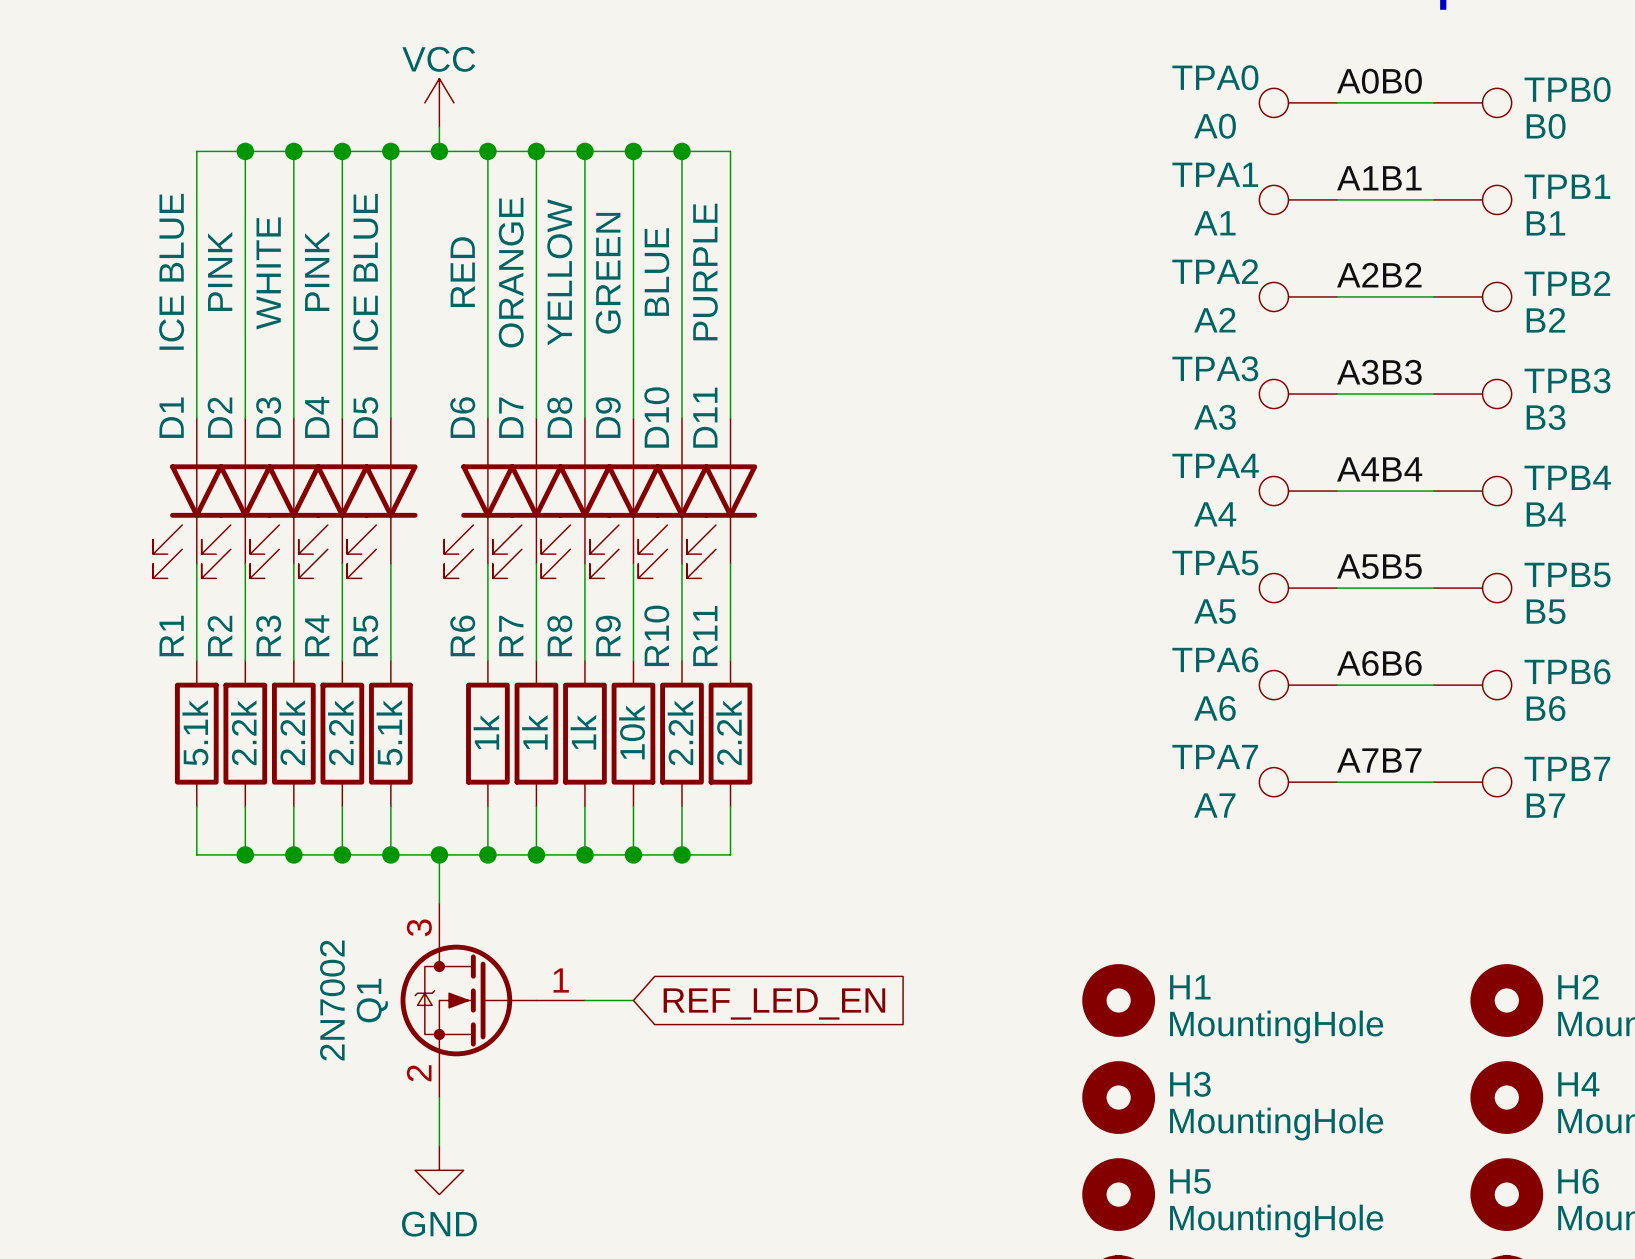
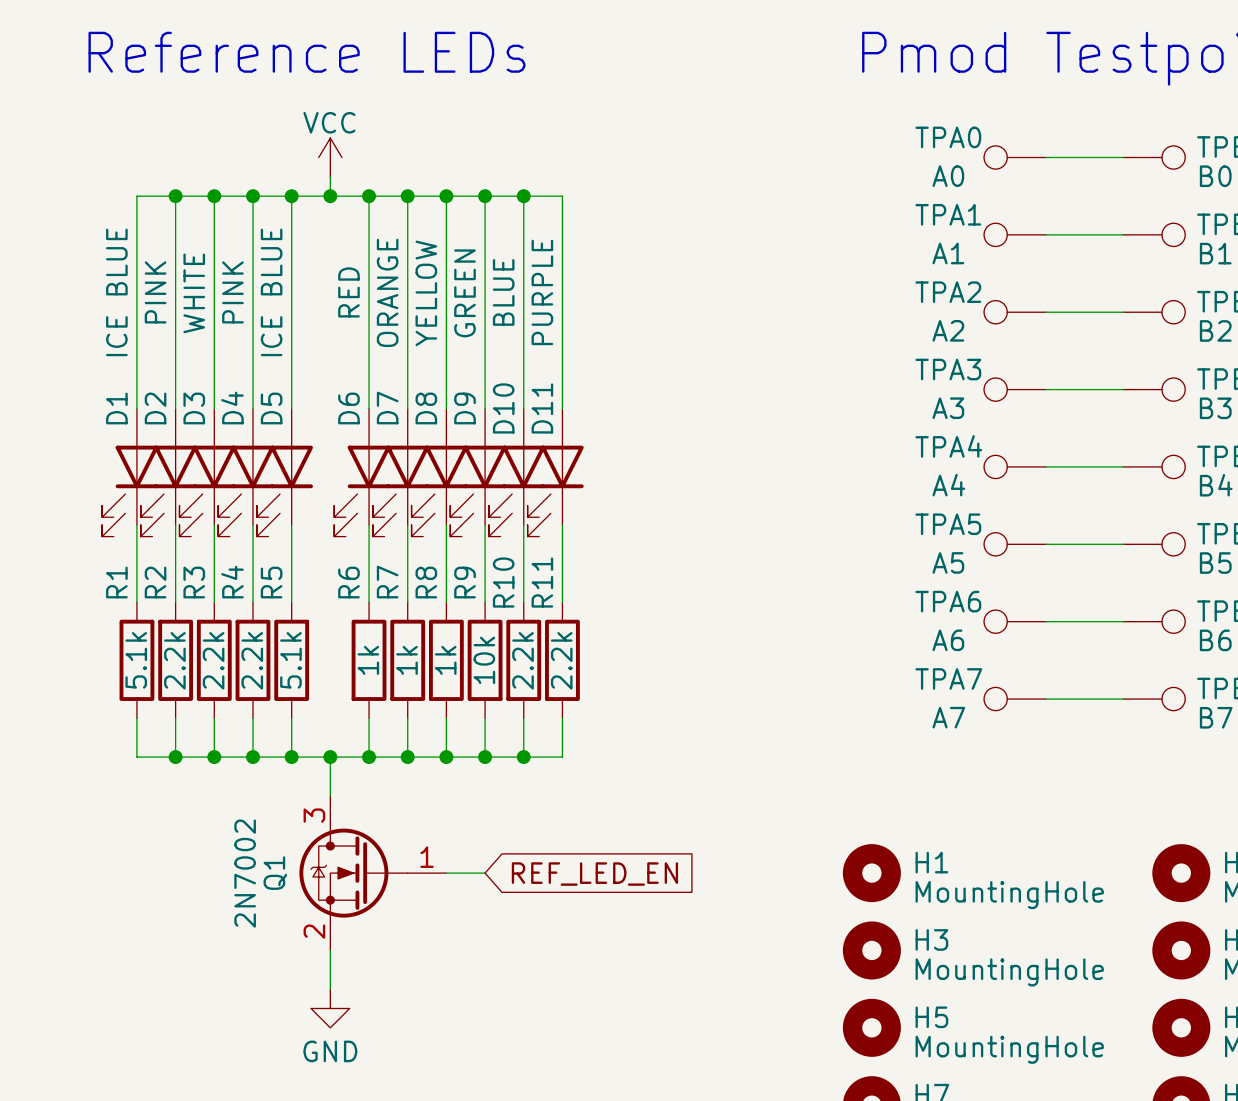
label: A0B0 (1379, 81) -> none
label: A1B1 (1379, 178) -> none
label: A2B2 (1379, 275) -> none
label: A3B3 (1379, 372) -> none
label: A4B4 (1379, 469) -> none
label: A5B5 (1379, 566) -> none
label: A6B6 (1379, 663) -> none
label: A7B7 (1379, 760) -> none

